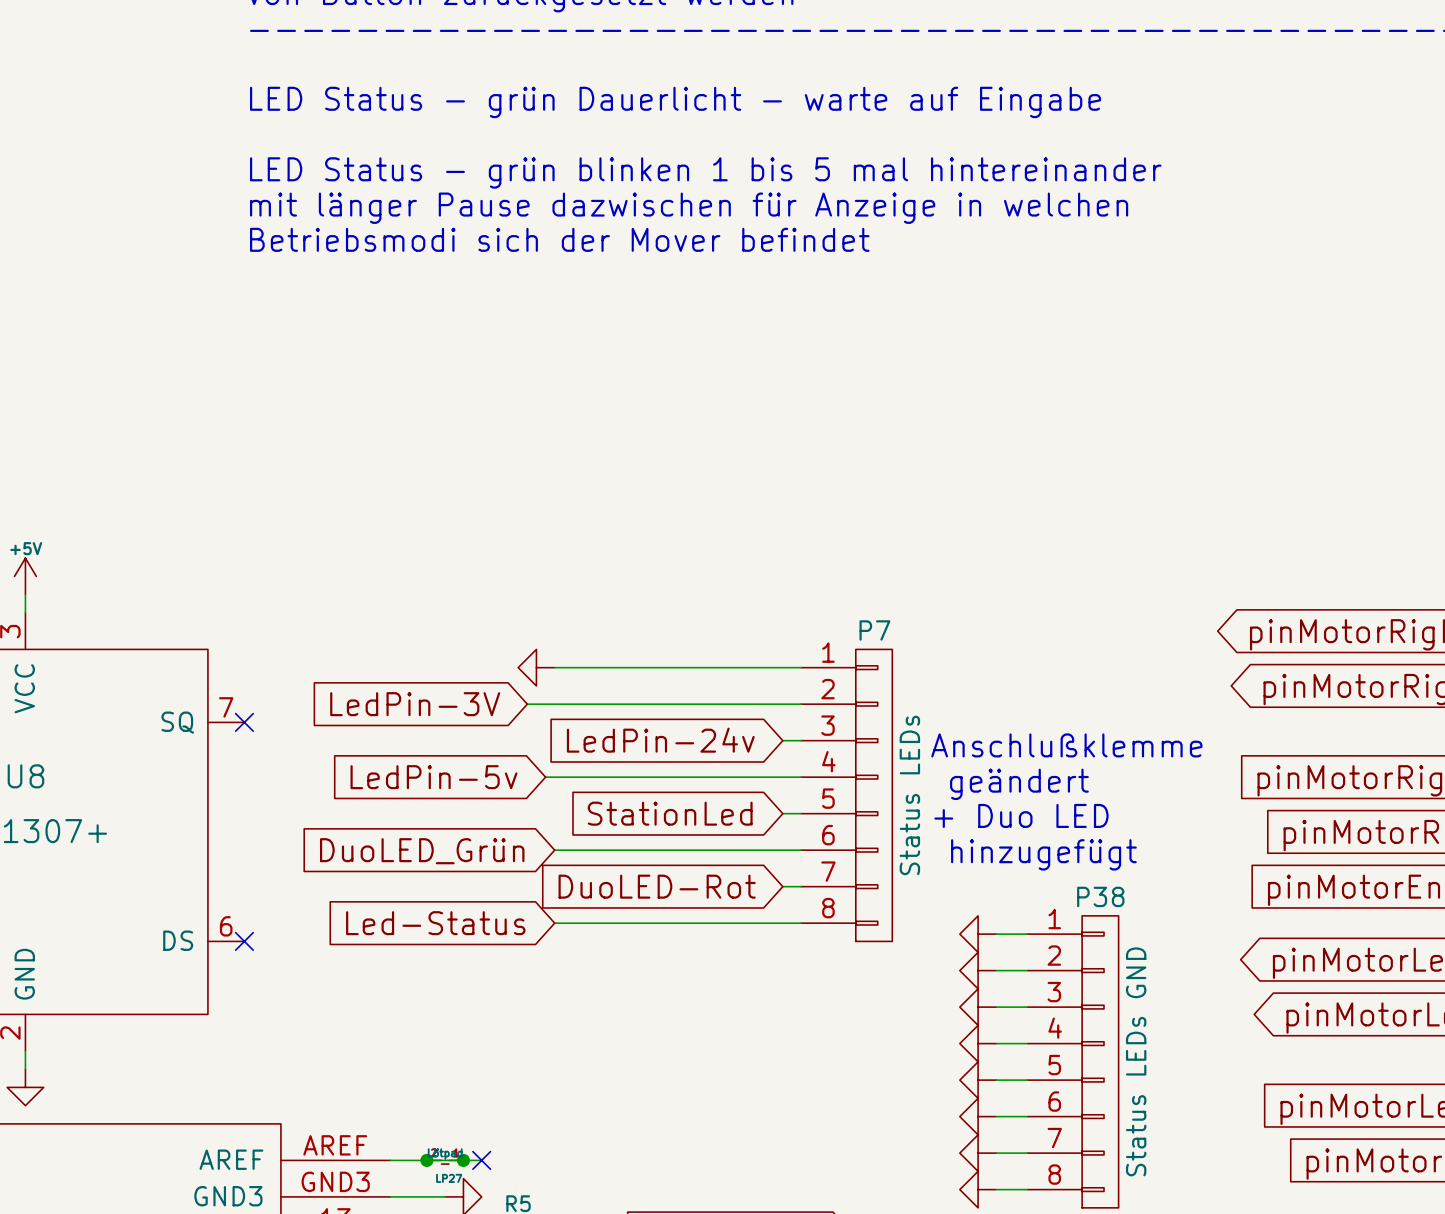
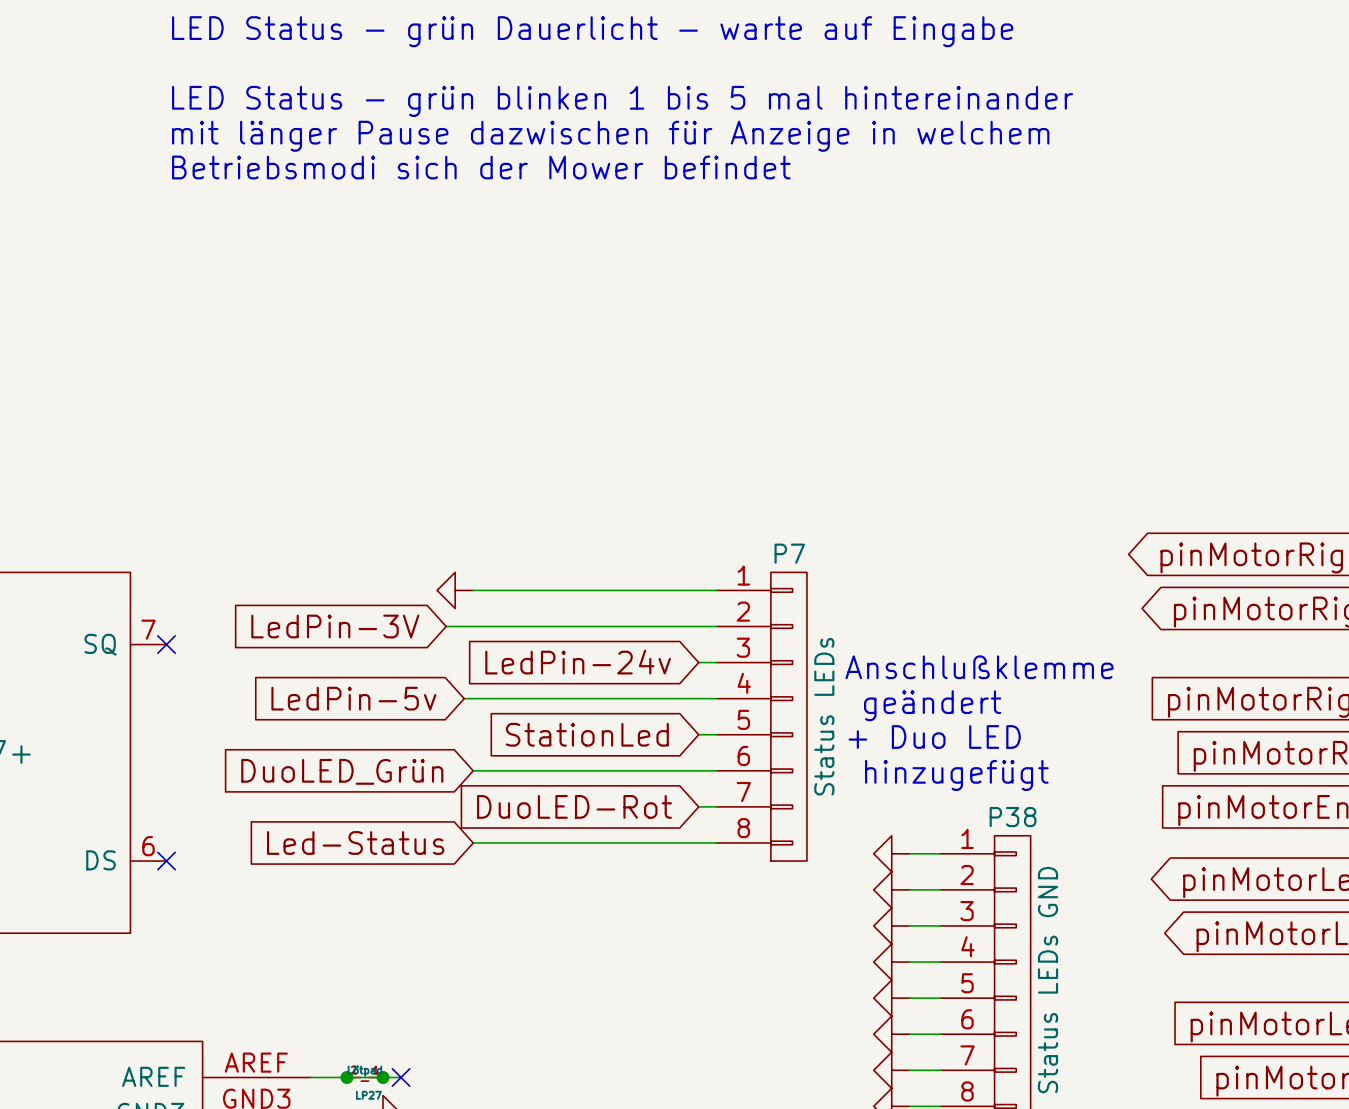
text: mit länger Pause dazwischen für Anzeige in welchen (689, 208) -> mit länger Pause dazwischen für Anzeige in welchem (610, 136)
text: Betriebsmodi sich der Mover befindet (559, 239) -> Betriebsmodi sich der Mower befindet (481, 167)

